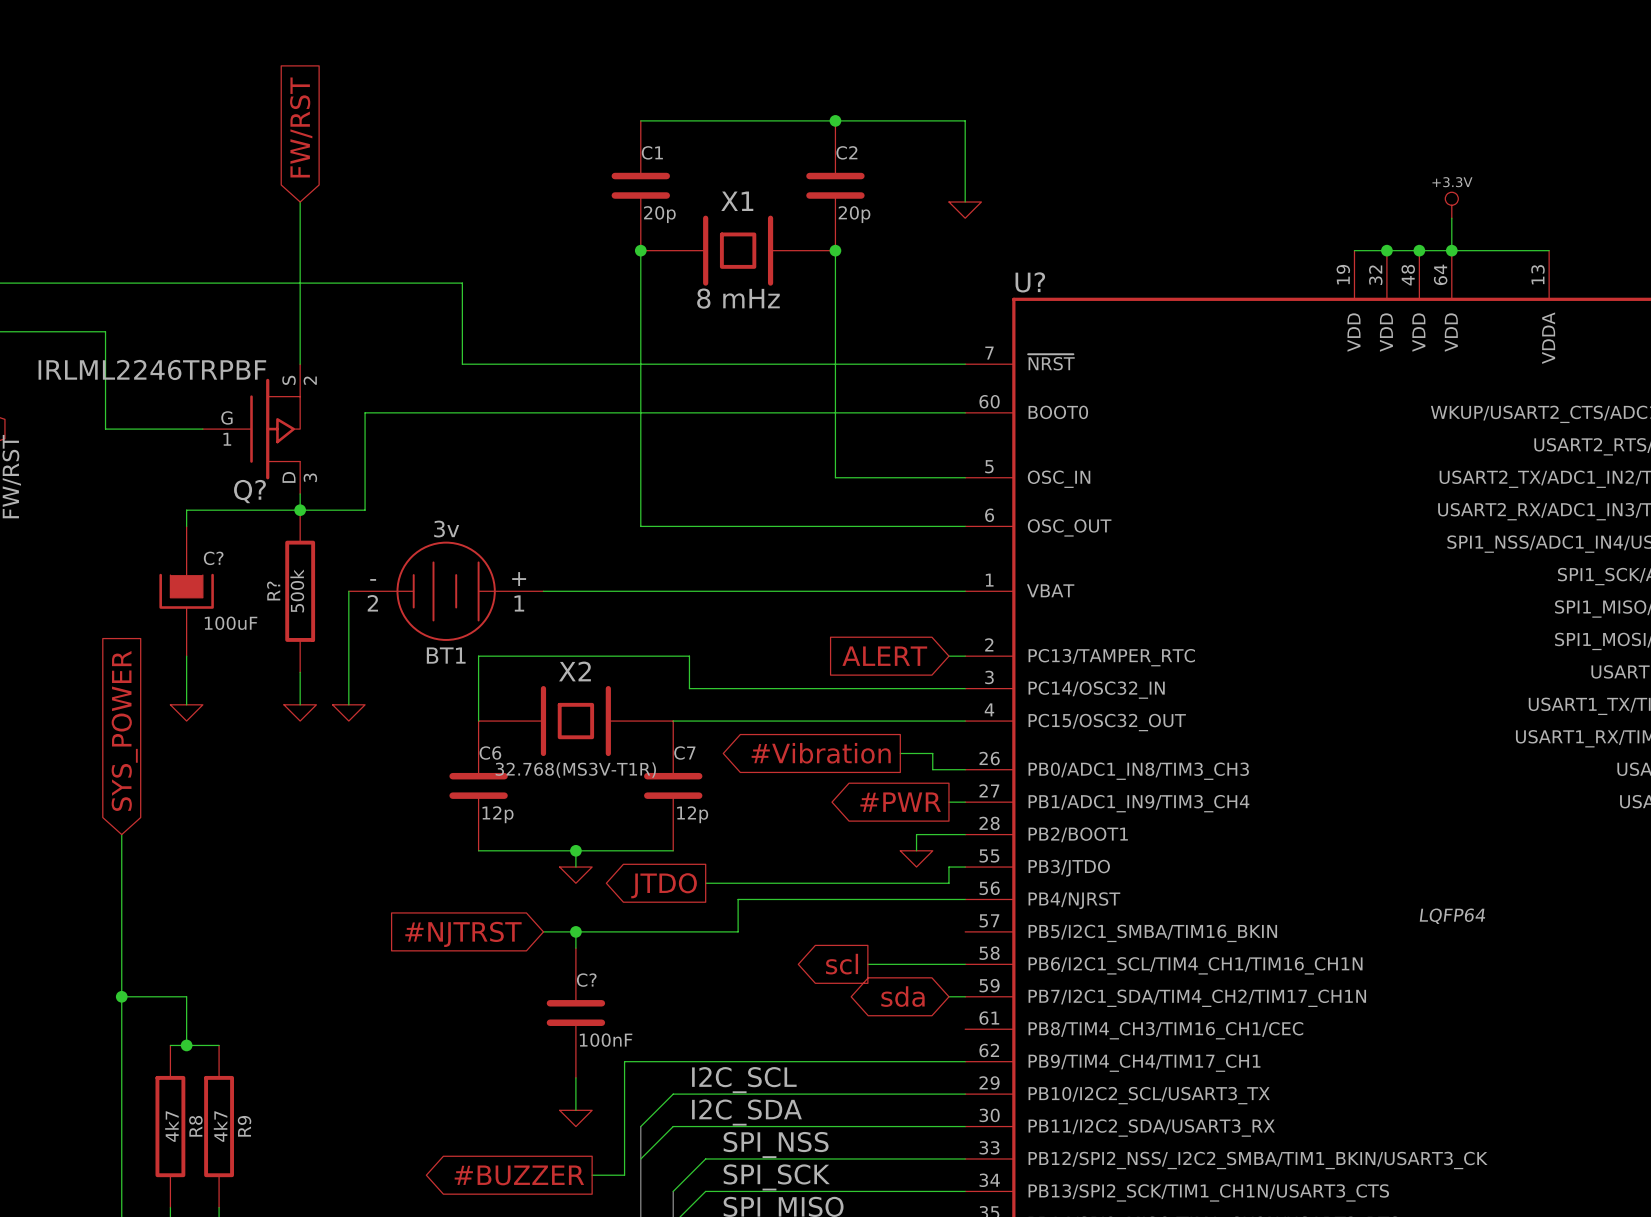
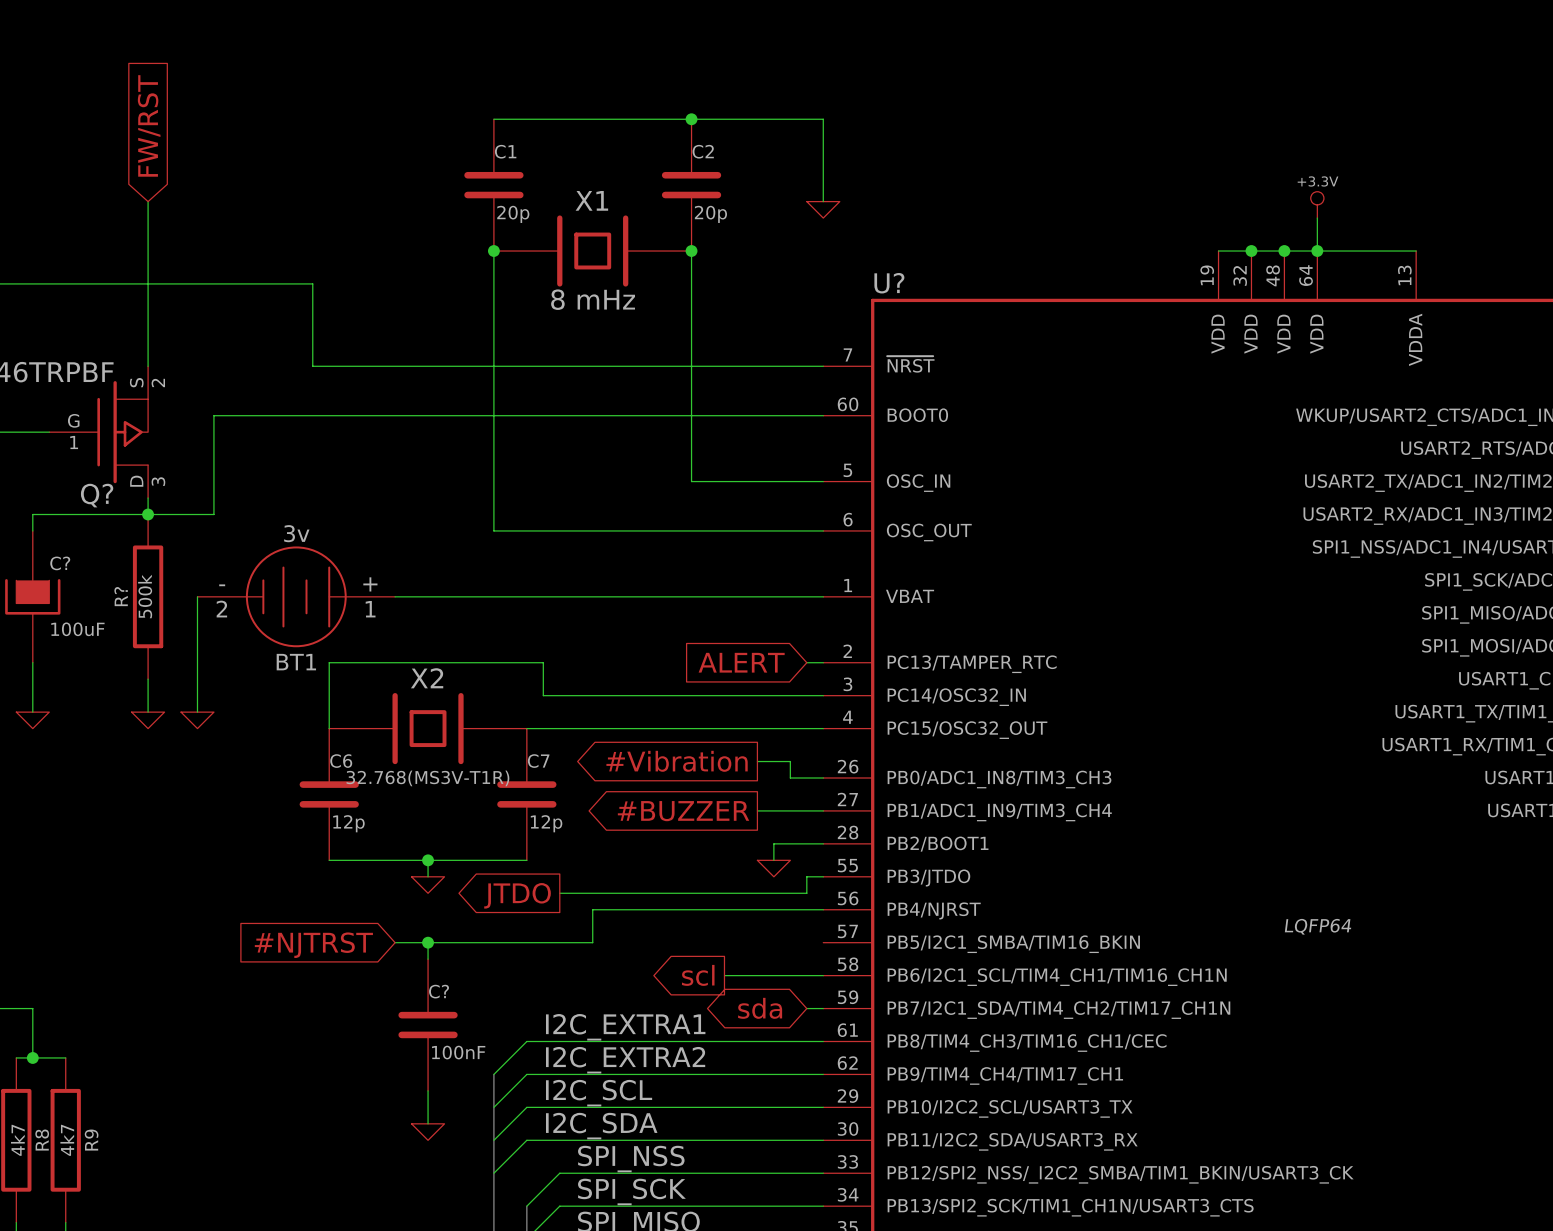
global label: none -> #BUZZER (683, 811)
wire: none -> (757, 810) (806, 810)
global label: #PWR (900, 802) -> none
label: none -> I2C_EXTRA1 (625, 1027)
wire: none -> (823, 1041) (526, 1041) (493, 1074)
label: none -> I2C_EXTRA2 (625, 1060)
bus: none -> (493, 1074) (493, 1140)
wire: (673, 1061) (624, 1061) (624, 1175) (592, 1175) -> (526, 1074) (493, 1107)
global label: #BUZZER (519, 1175) -> none

